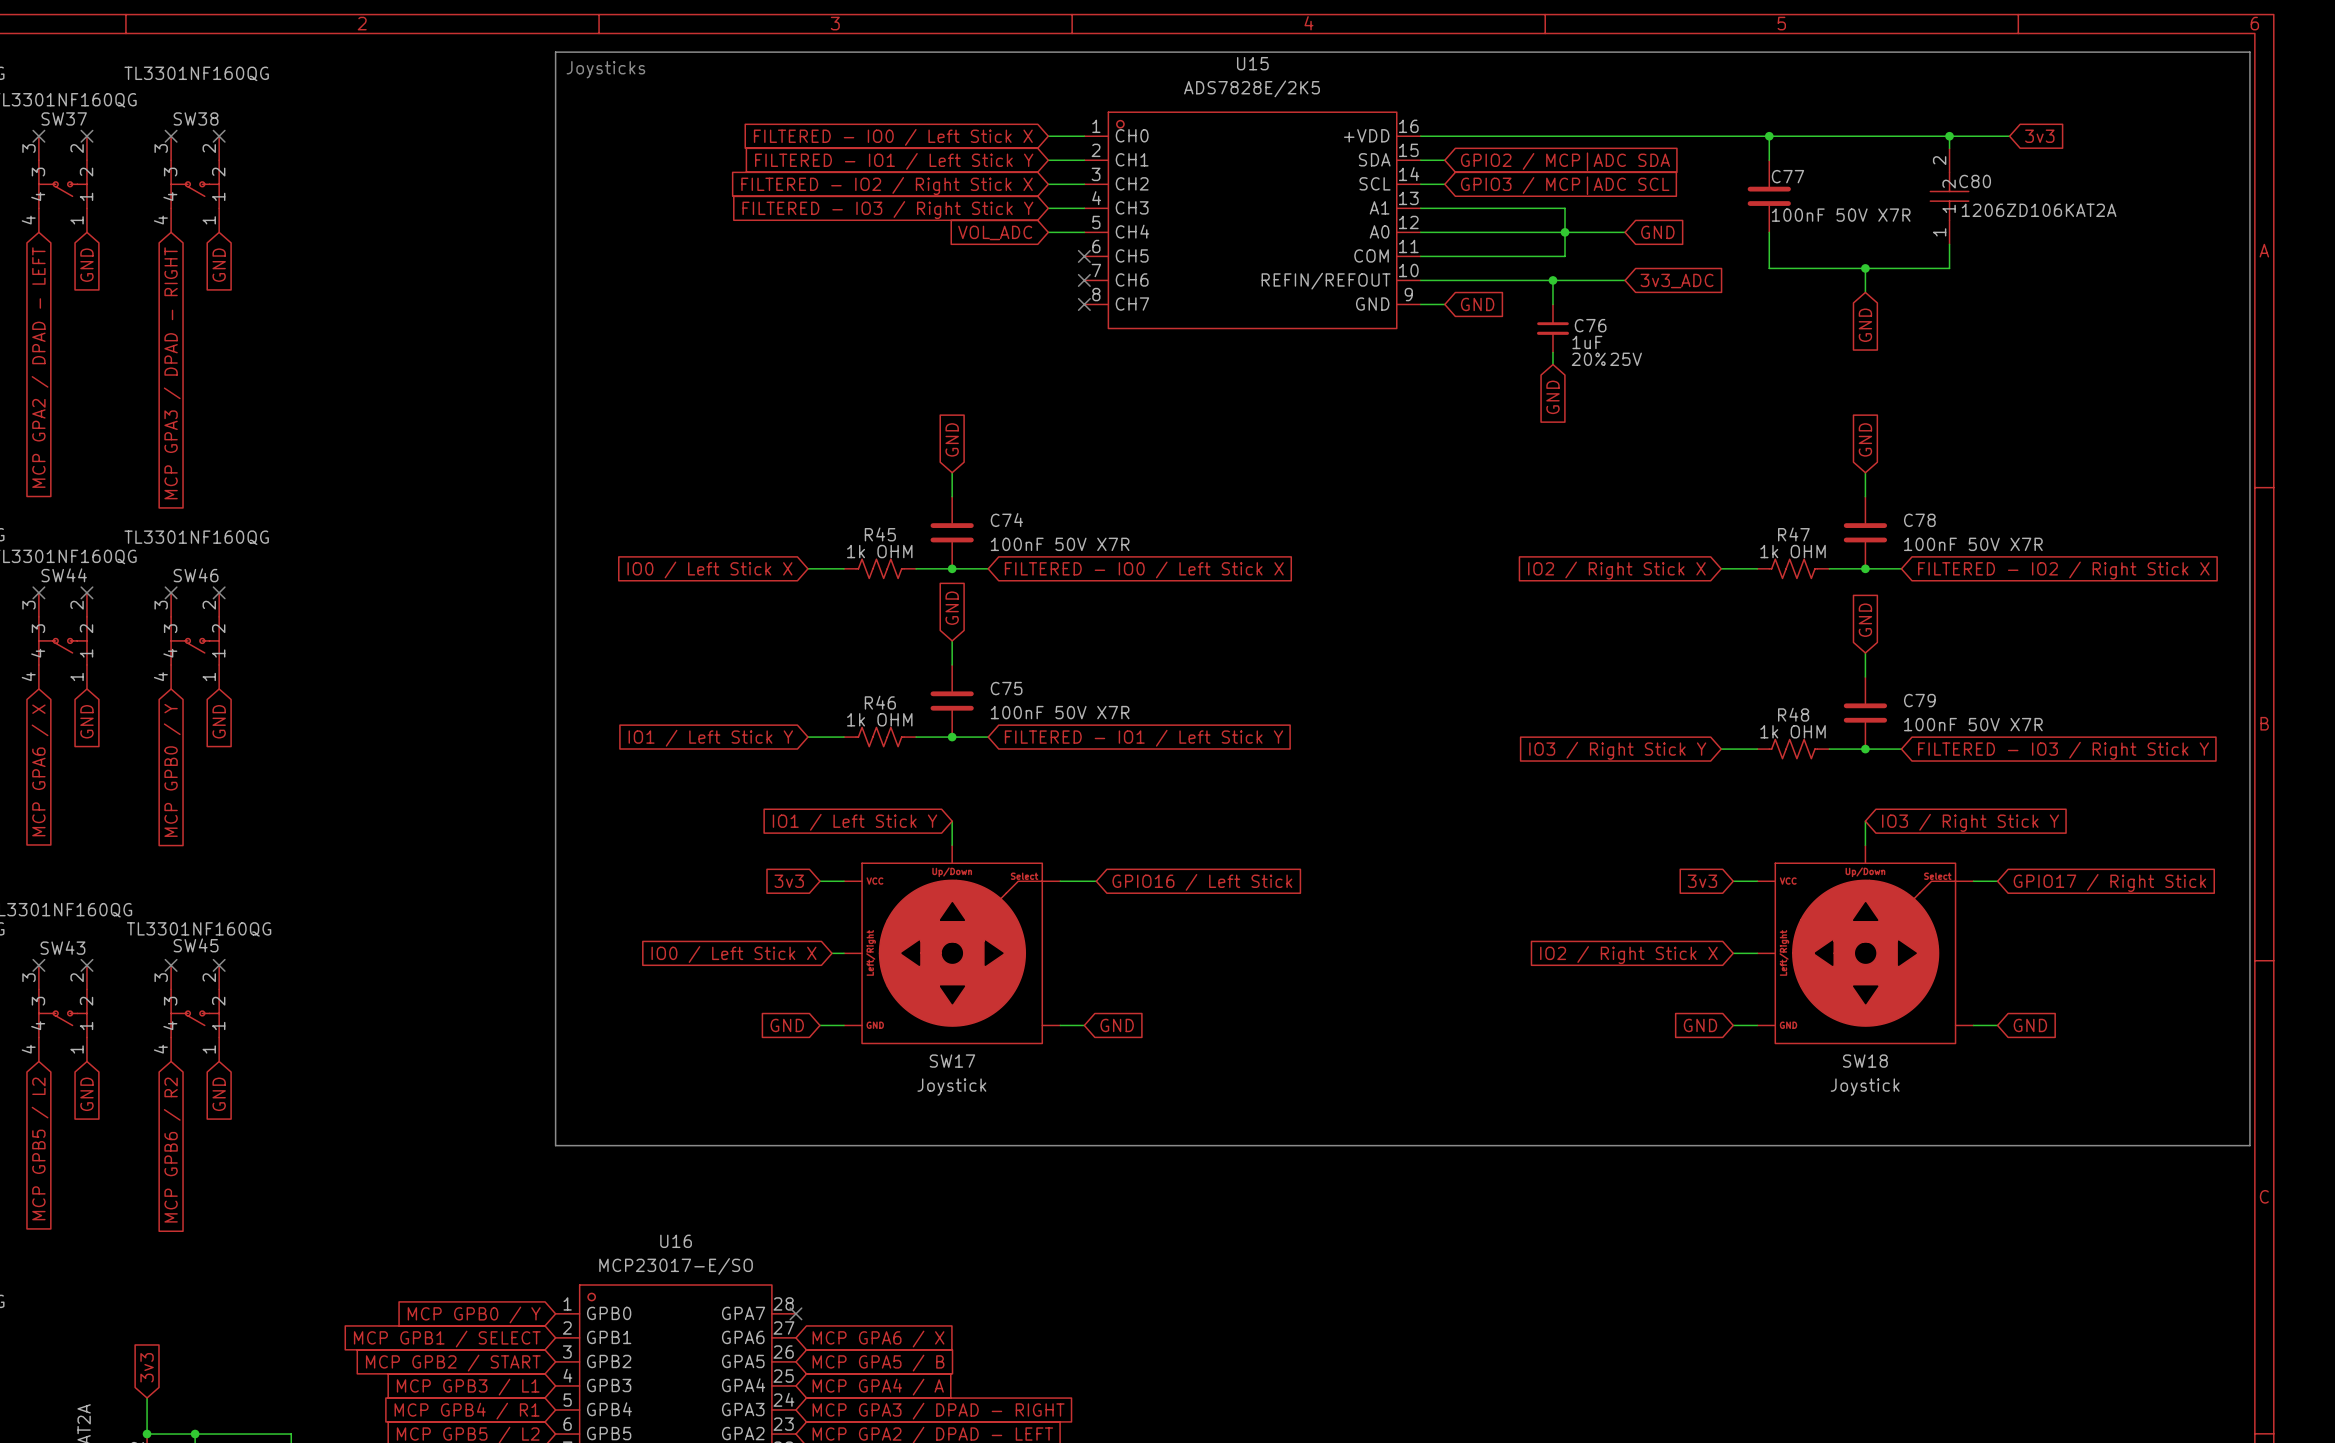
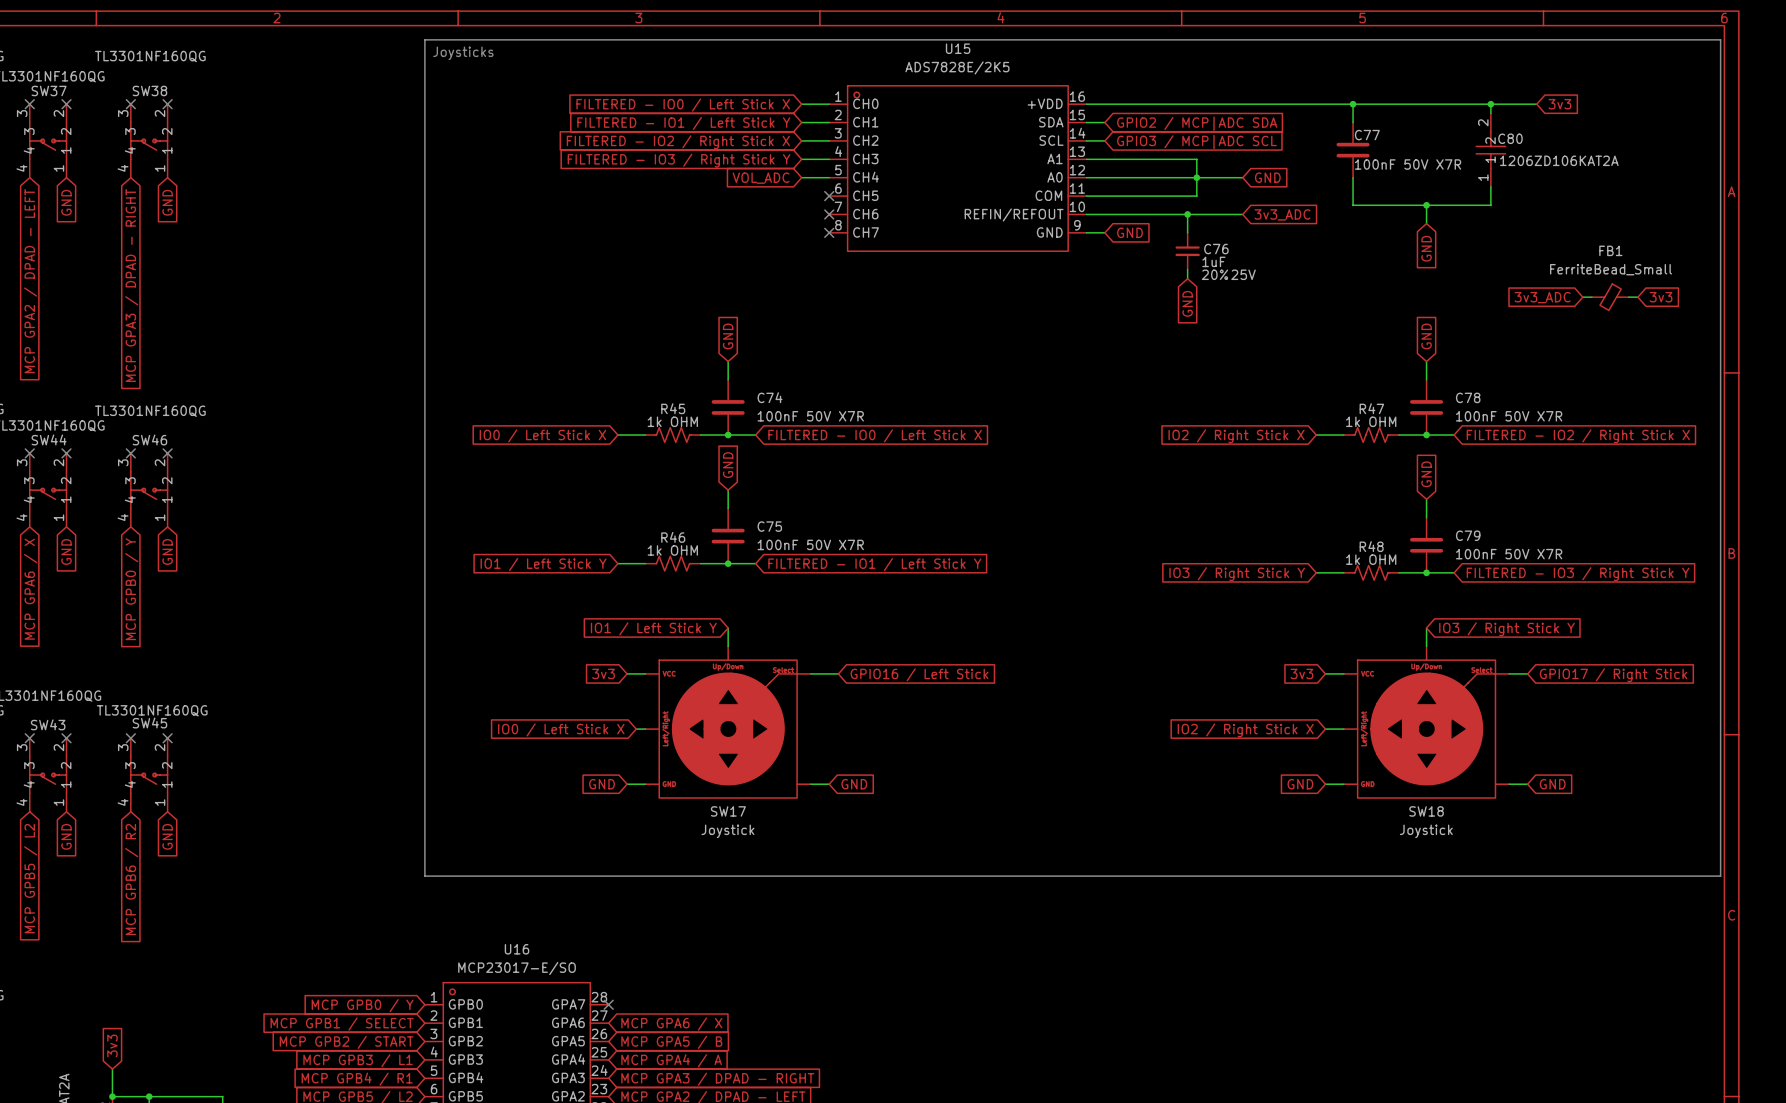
wire: none -> (1582, 297) (1591, 297)
FB1: none -> FerriteBead_Small (1610, 297)
wire: none -> (1628, 297) (1637, 297)
global label: none -> 3v3 (1661, 297)
global label: none -> 3v3_ADC (1542, 297)

